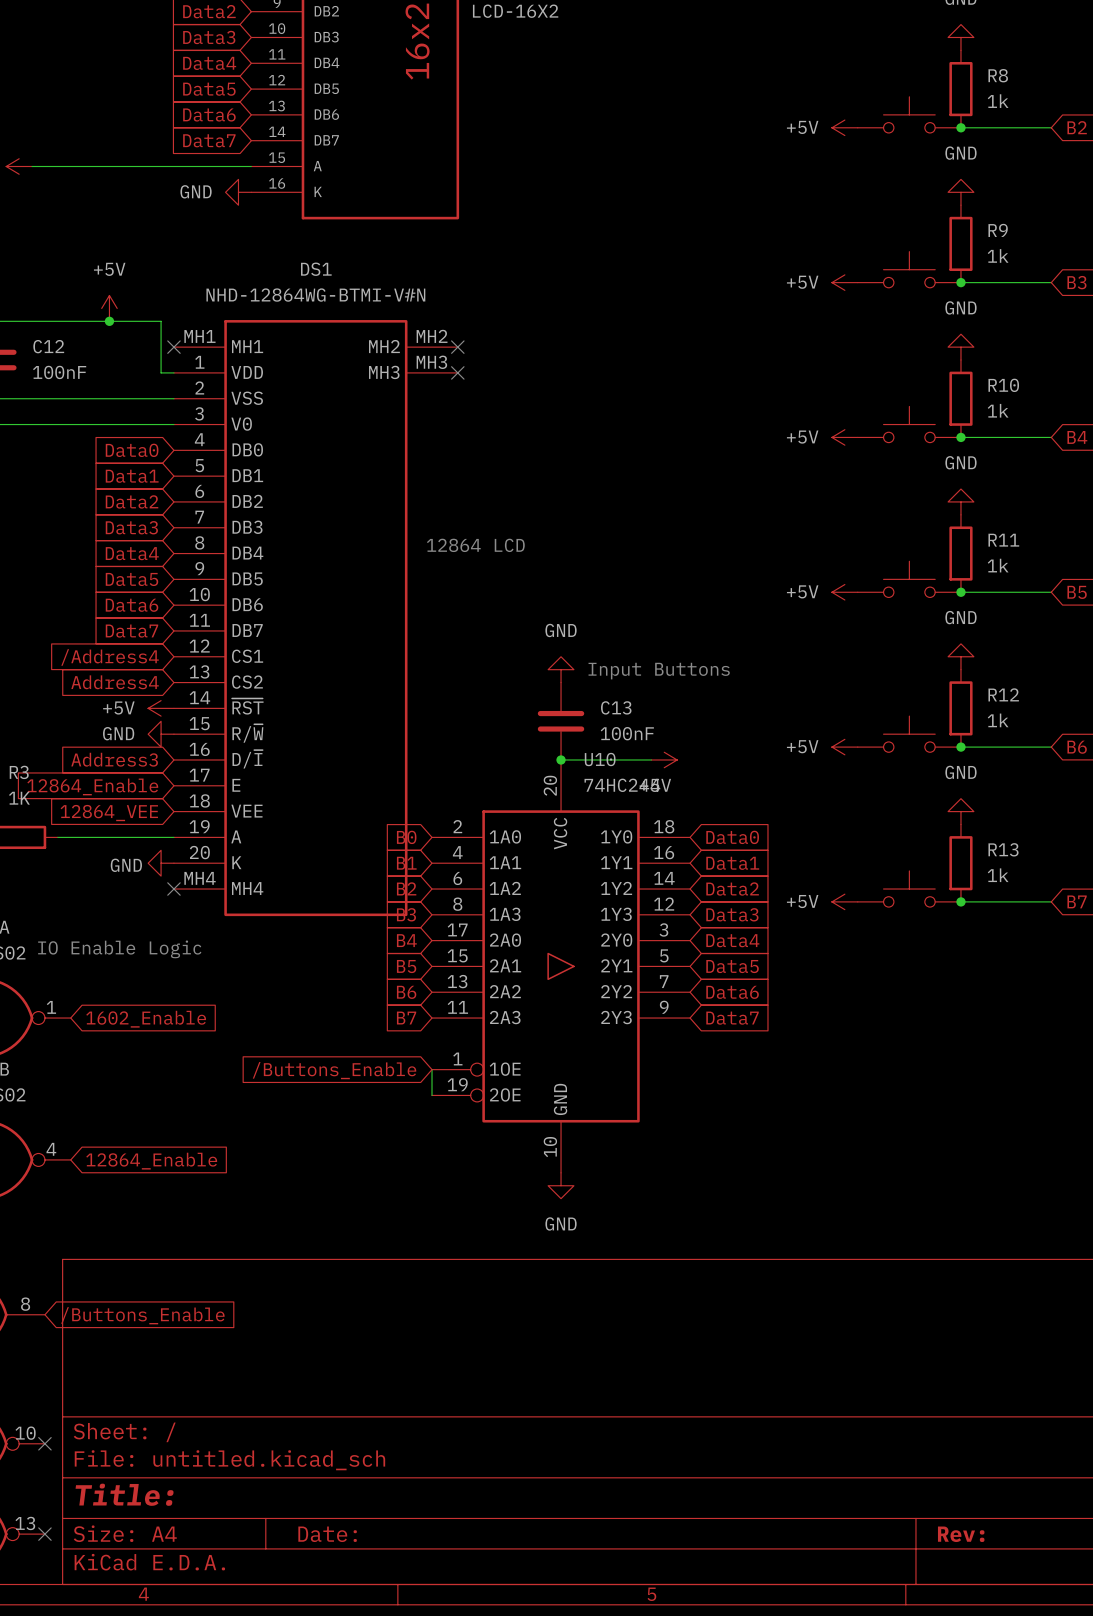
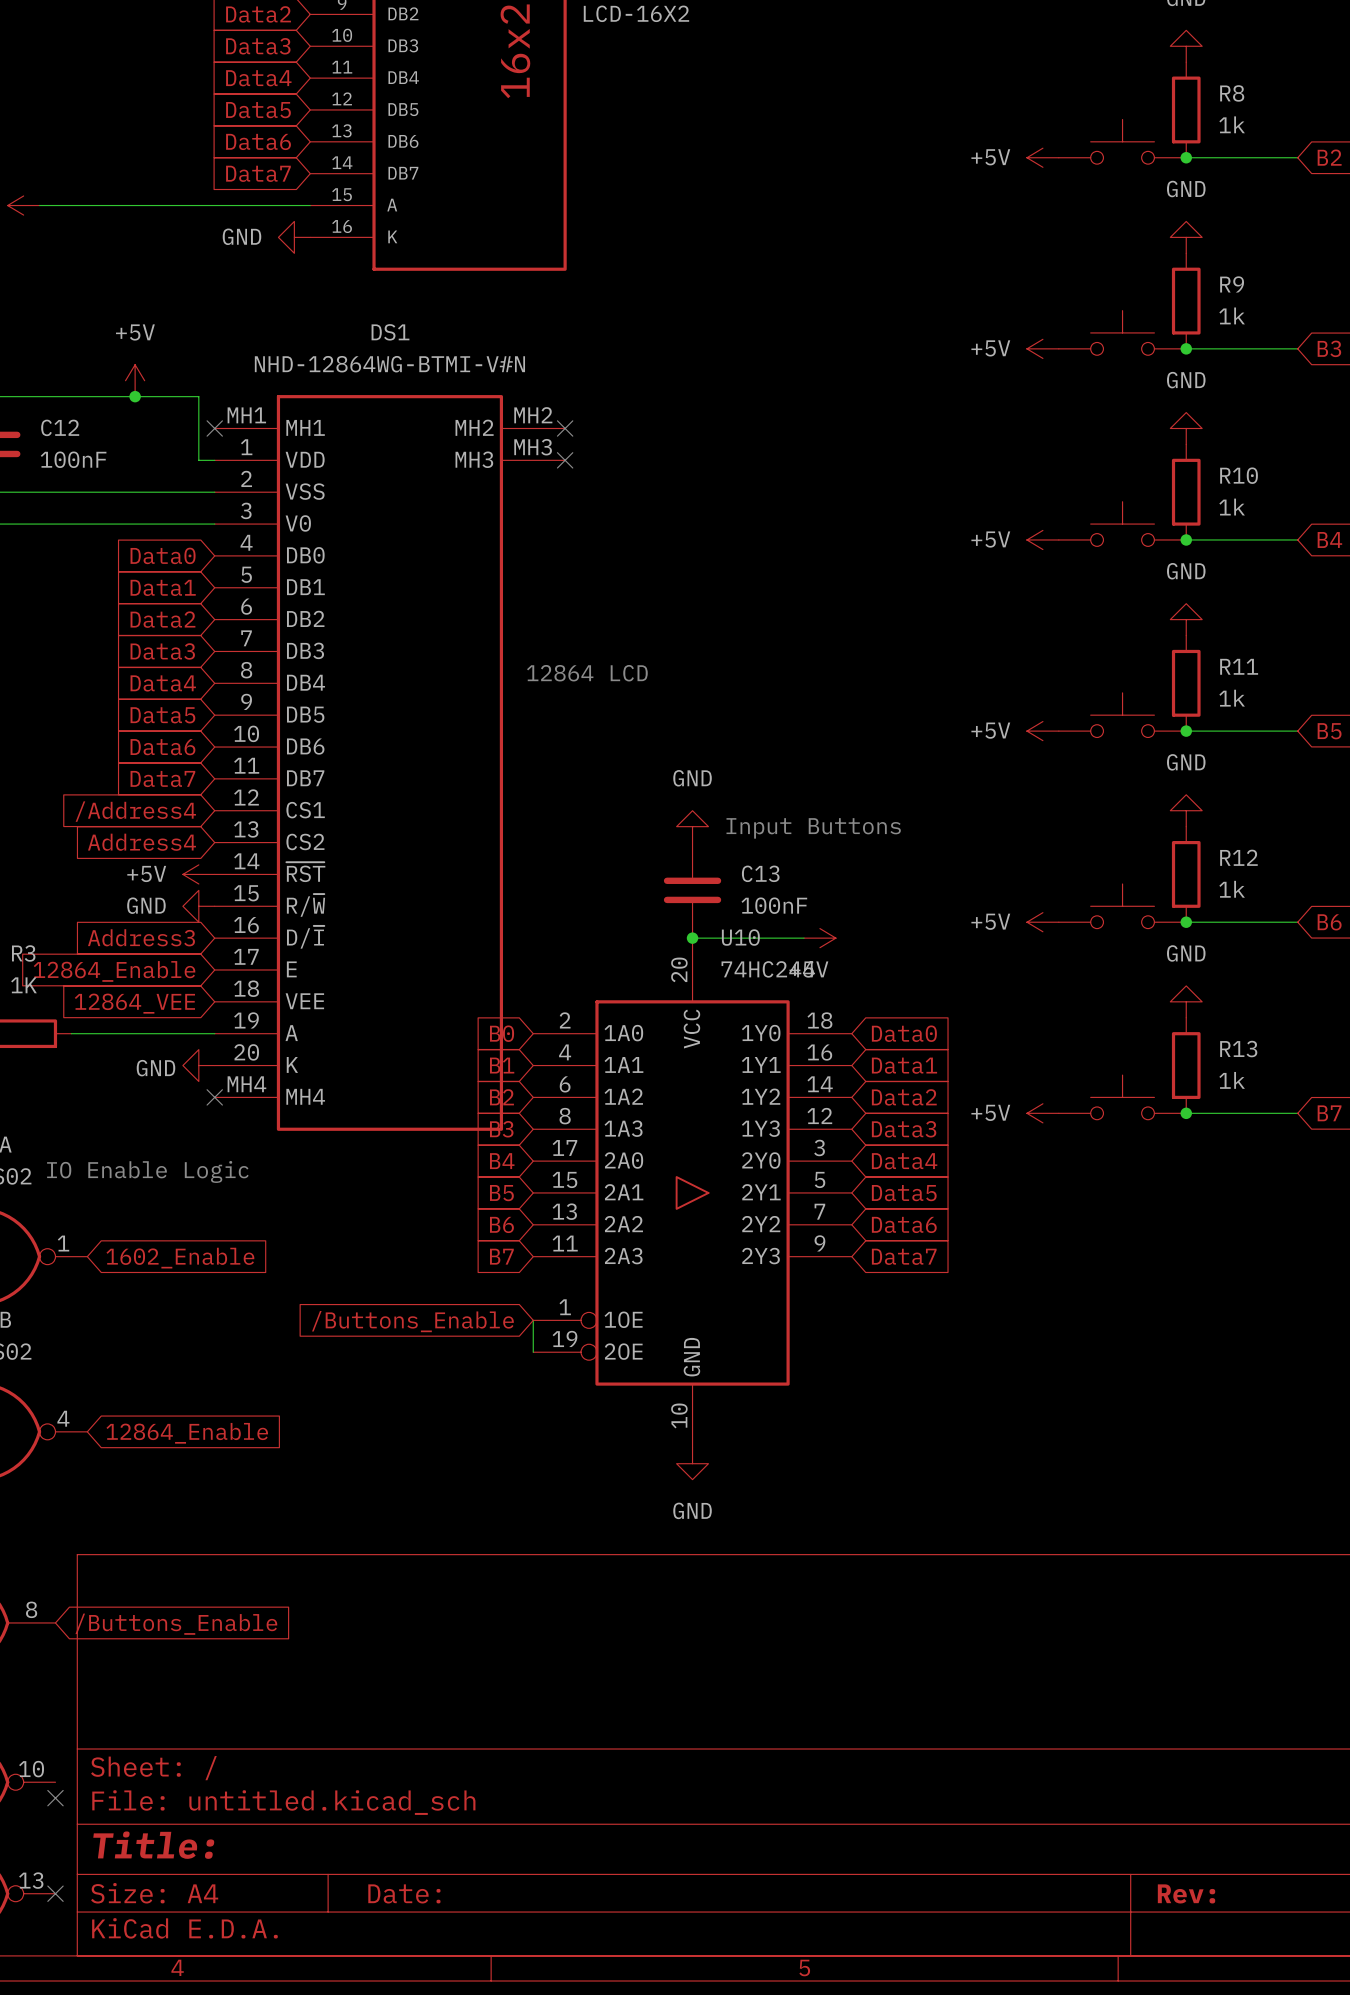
no-connect mark position: (44, 1443) -> (55, 1798)

